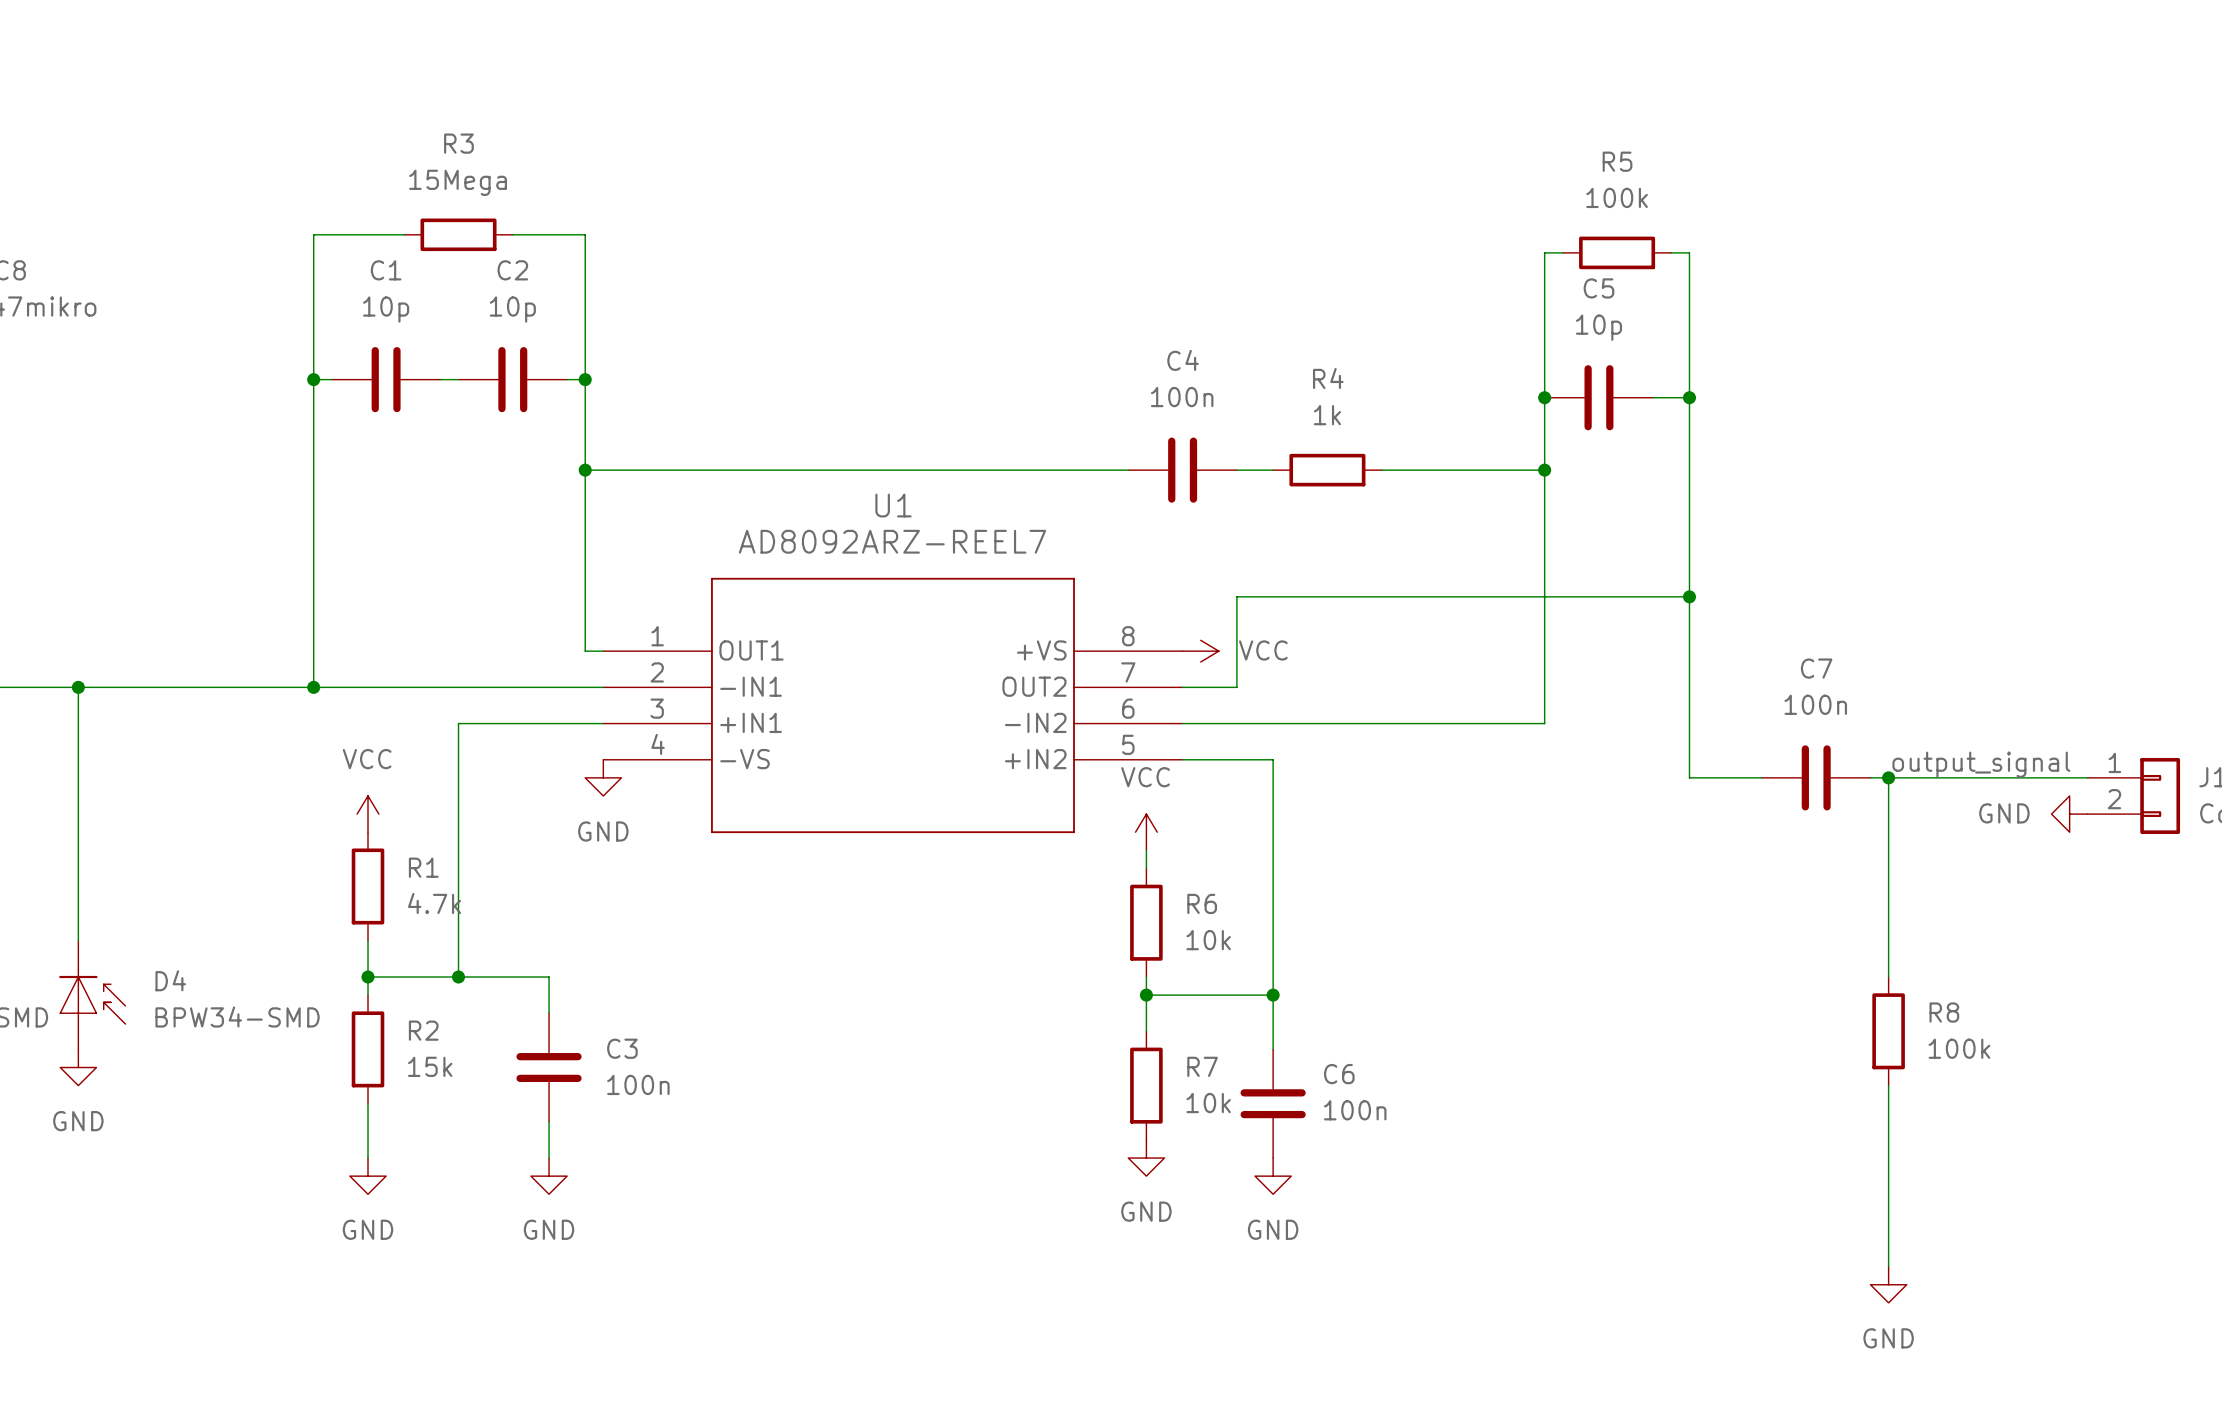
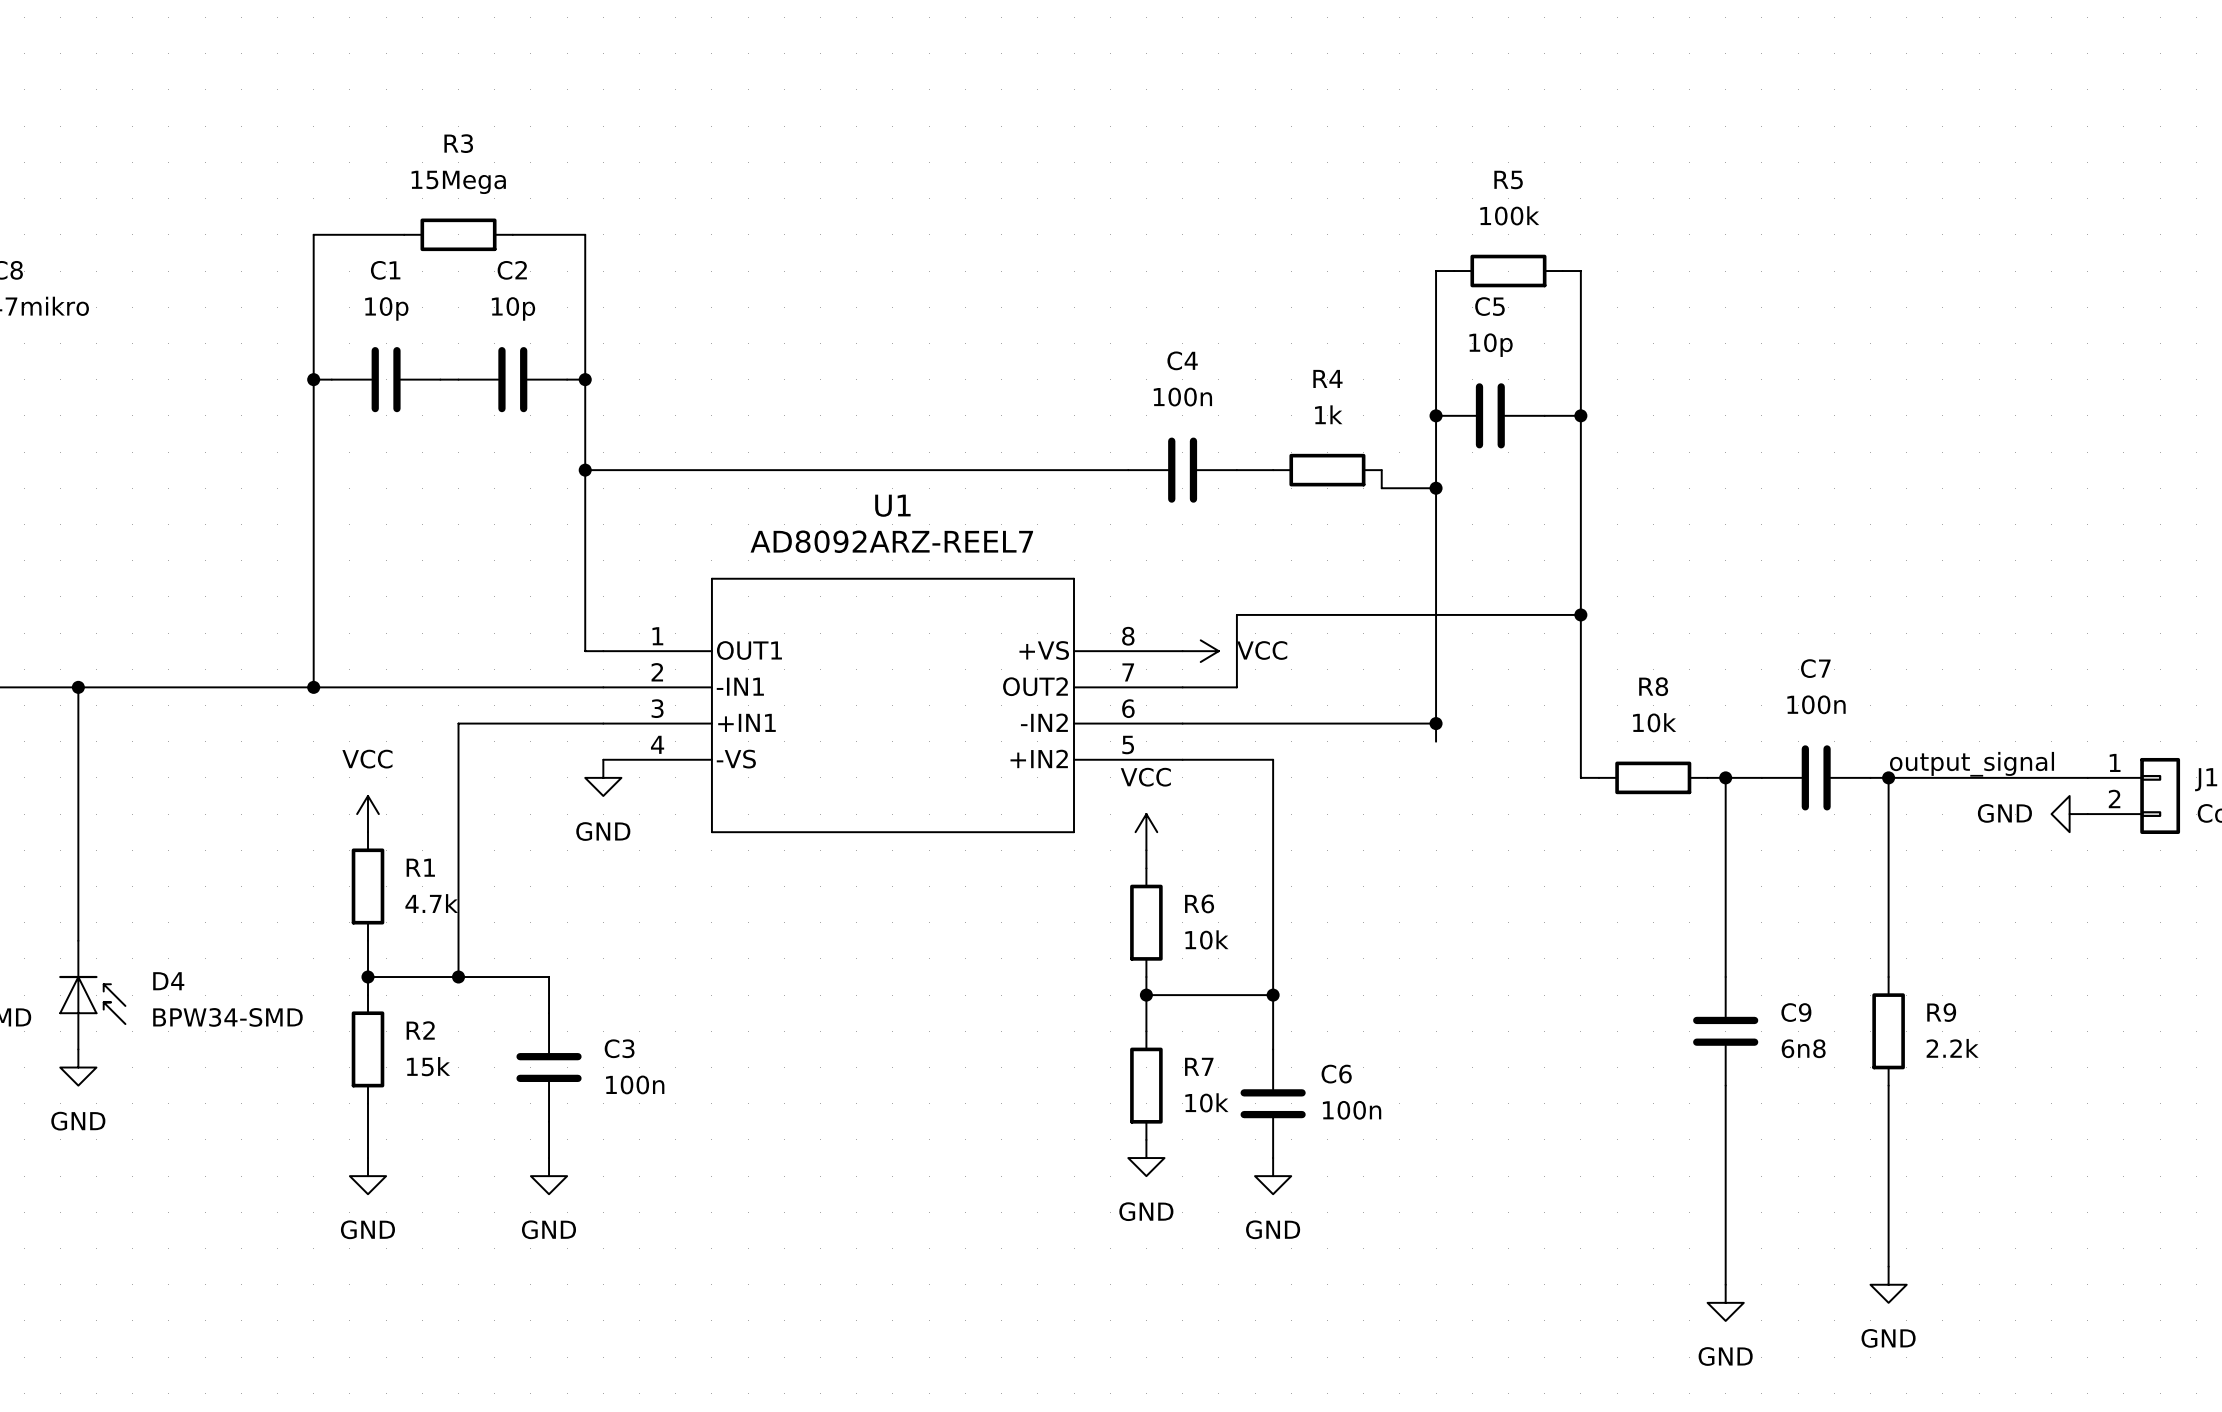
wire: (1562, 252) (1544, 252) (1544, 723) (1436, 723) -> none
R5 position: (1617, 252) -> (1508, 271)
wire: (1671, 252) (1689, 252) (1689, 777) (1707, 777) -> none
wire: none -> (1454, 271) (1436, 271) (1436, 741)
wire: none -> (1562, 271) (1580, 271) (1580, 777) (1598, 777)
junction: (1544, 397) -> none
C5 position: (1598, 397) -> (1490, 415)
wire: (1653, 397) (1689, 397) -> (1544, 415) (1580, 415)
junction: (1689, 397) -> none
junction: none -> (1436, 415)
junction: none -> (1580, 415)
wire: (1381, 470) (1544, 470) -> (1381, 470) (1381, 488) (1436, 488)
junction: (1544, 470) -> none
junction: none -> (1436, 488)
wire: (1689, 596) (1236, 596) (1236, 614) -> (1580, 614) (1236, 614)
junction: (1689, 596) -> none
junction: none -> (1580, 614)
junction: none -> (1436, 723)
R8: none -> 10k (1653, 777)
wire: none -> (1725, 777) (1725, 977)
junction: none -> (1725, 777)
R8 name: R8 (1944, 1012) -> R9 (1941, 1012)
C9: none -> 6n8 (1725, 1031)
R8 value: 100k (1959, 1048) -> 2.2k (1952, 1048)
wire: none -> (1725, 1085) (1725, 1284)
power symbol: none -> GND (1725, 1302)

